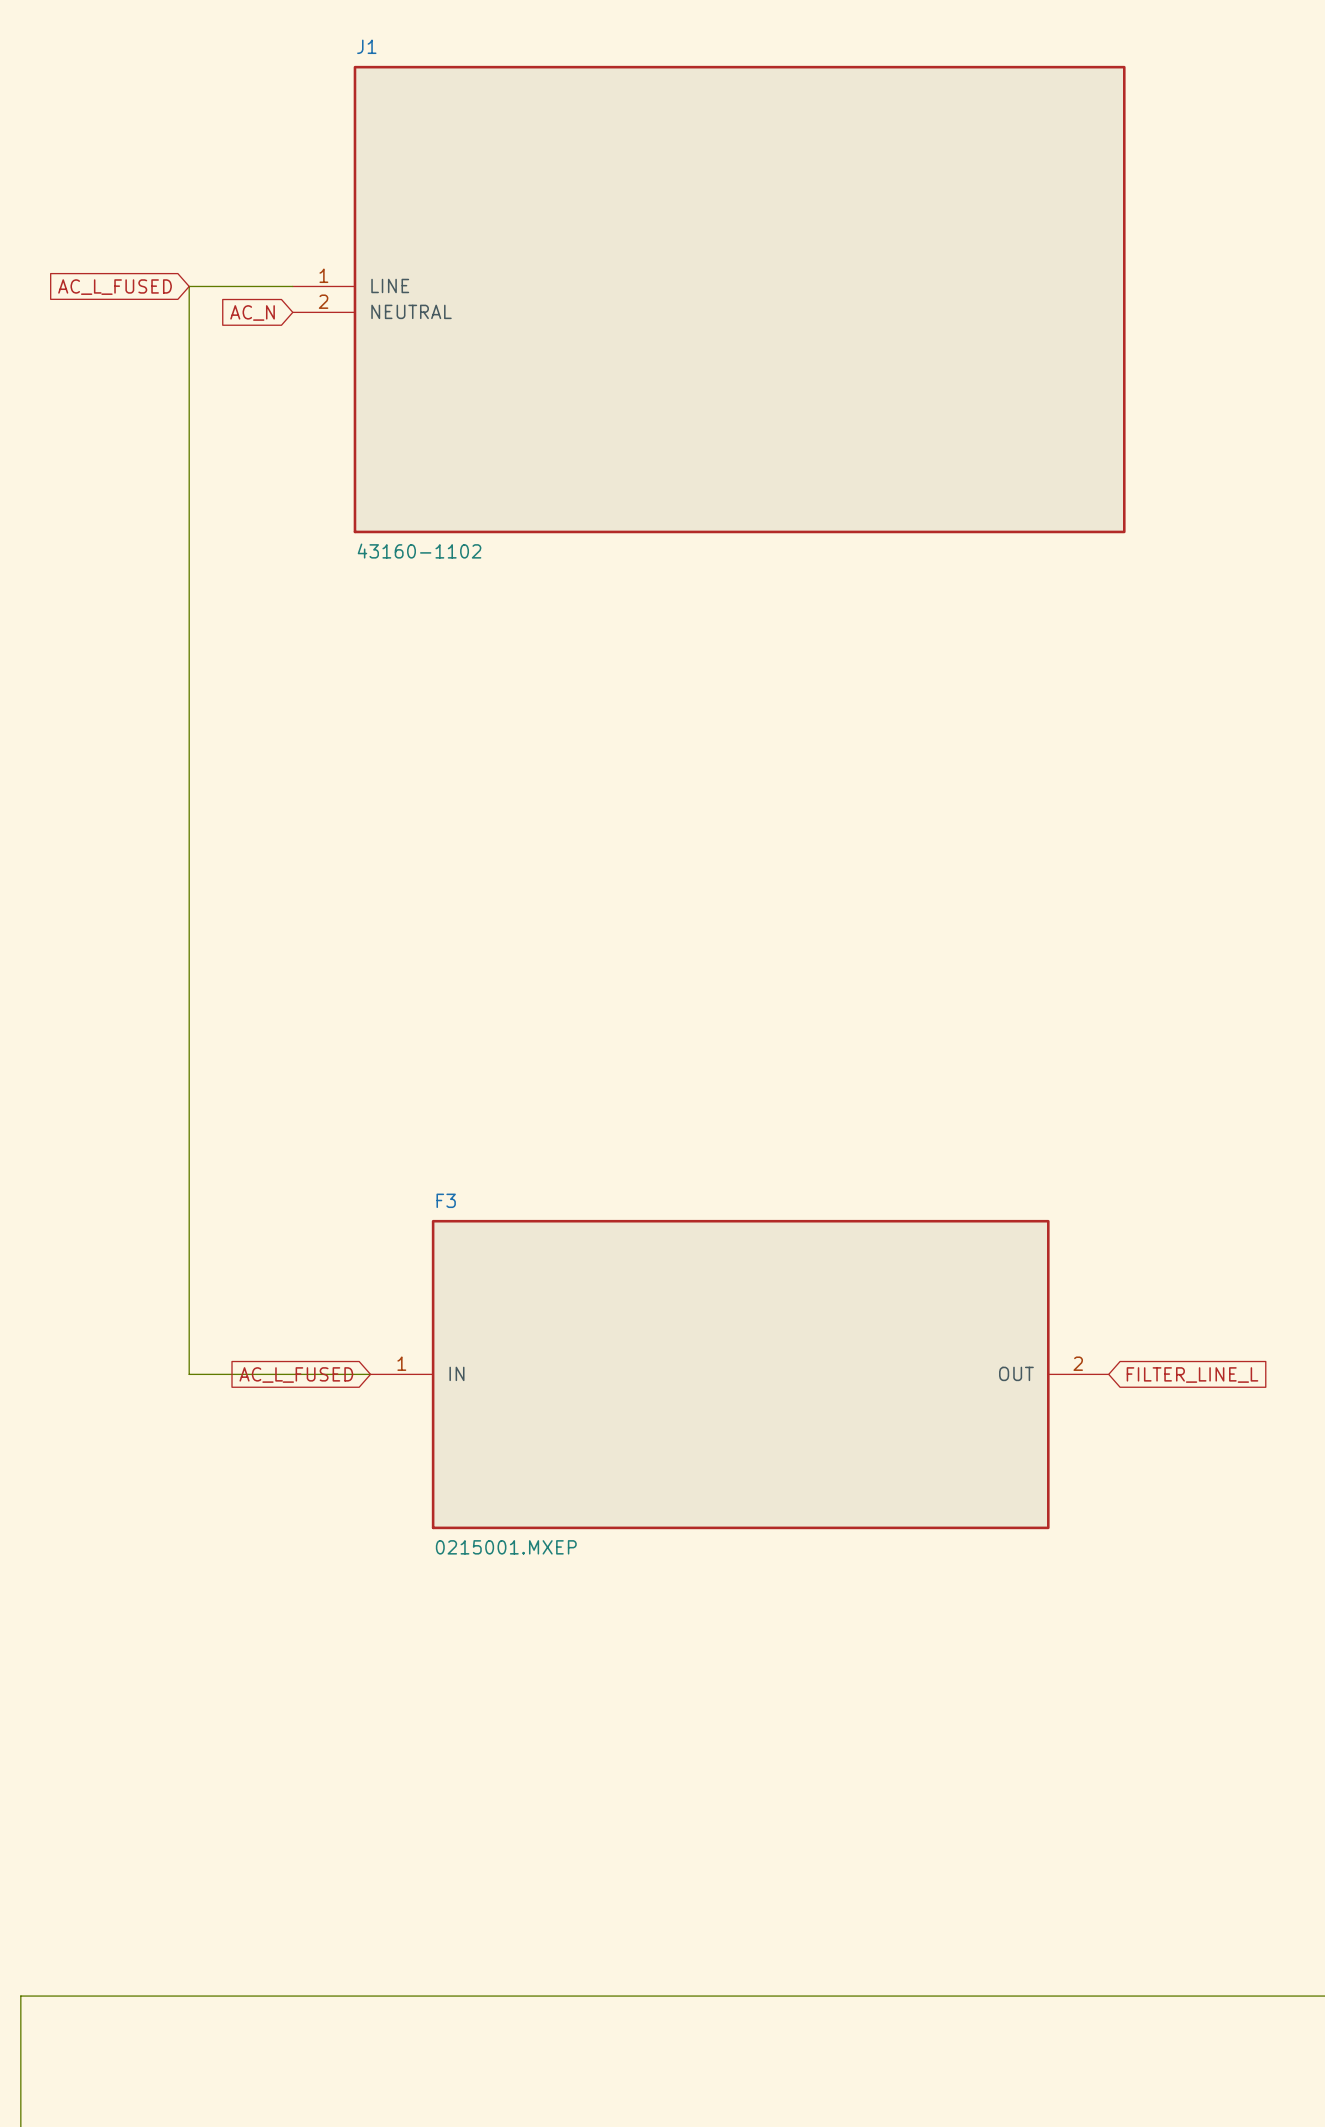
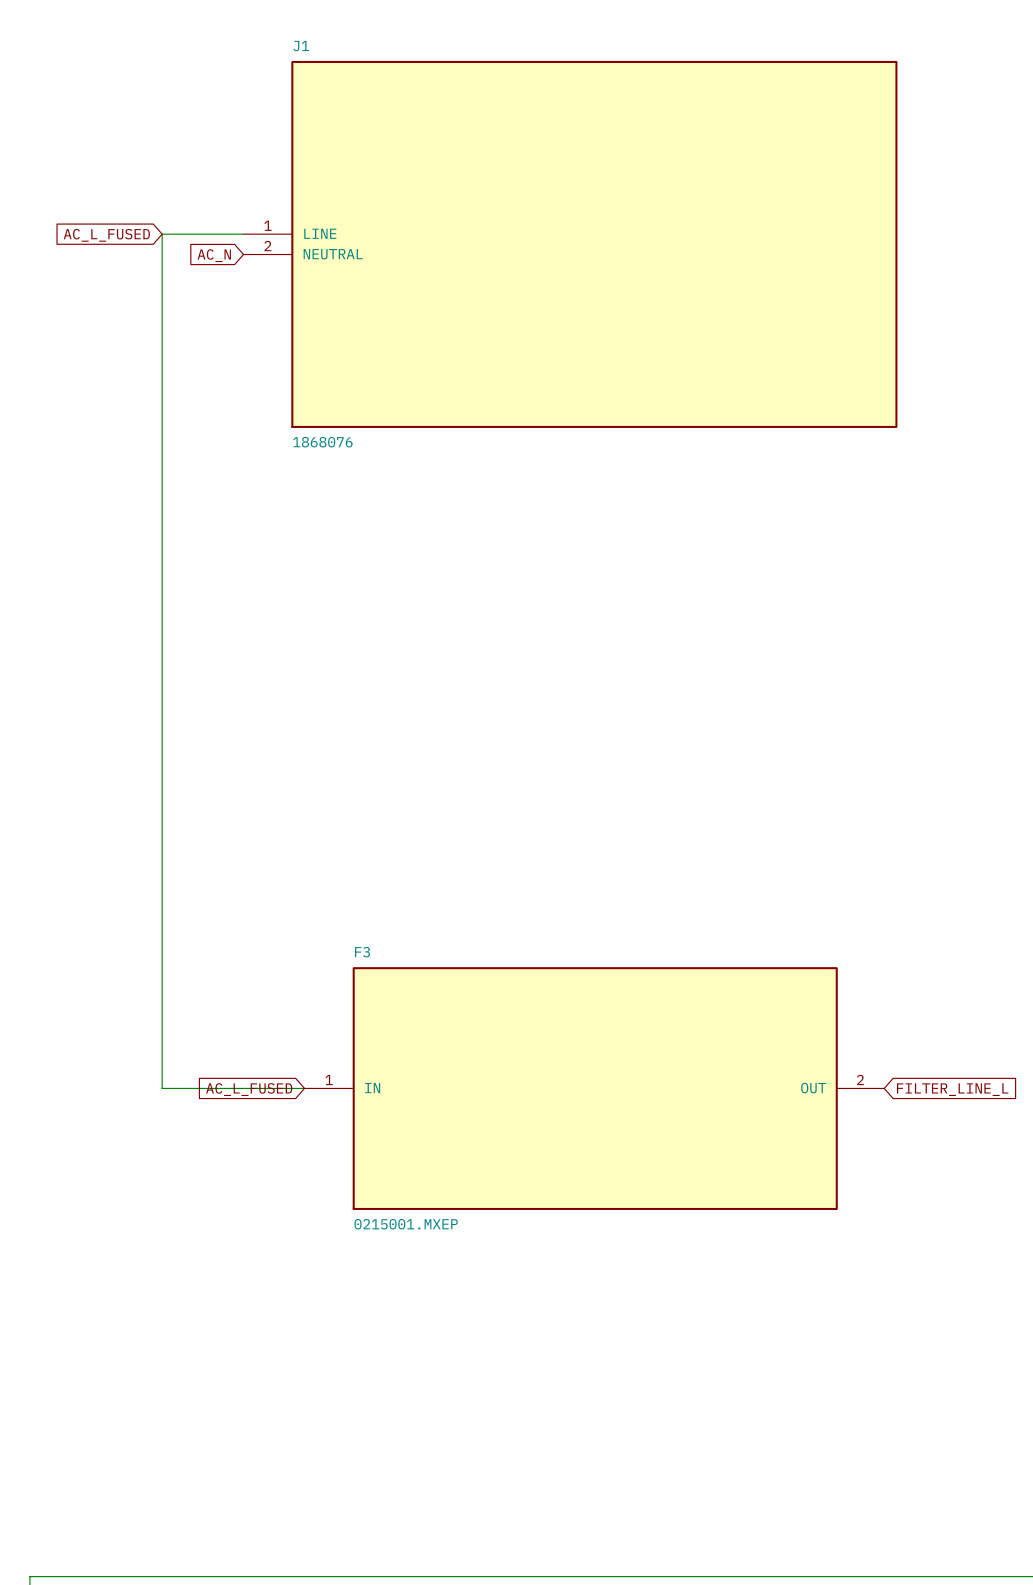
J1 value: 43160-1102 (419, 551) -> 1868076 (322, 442)

